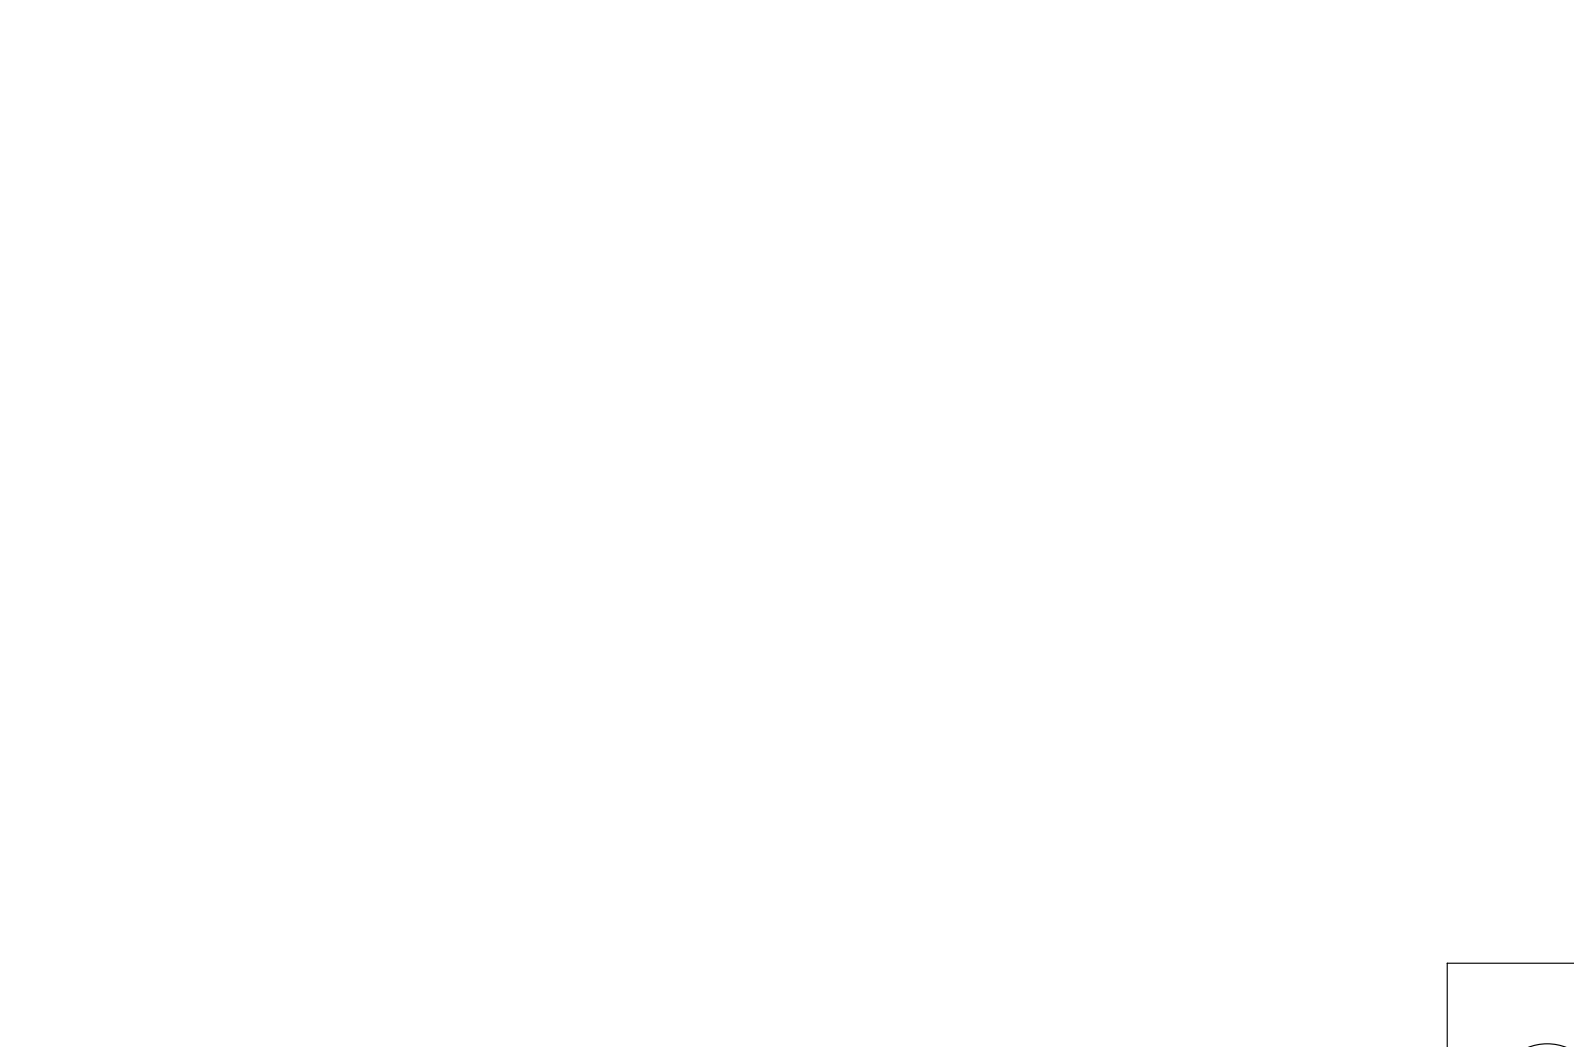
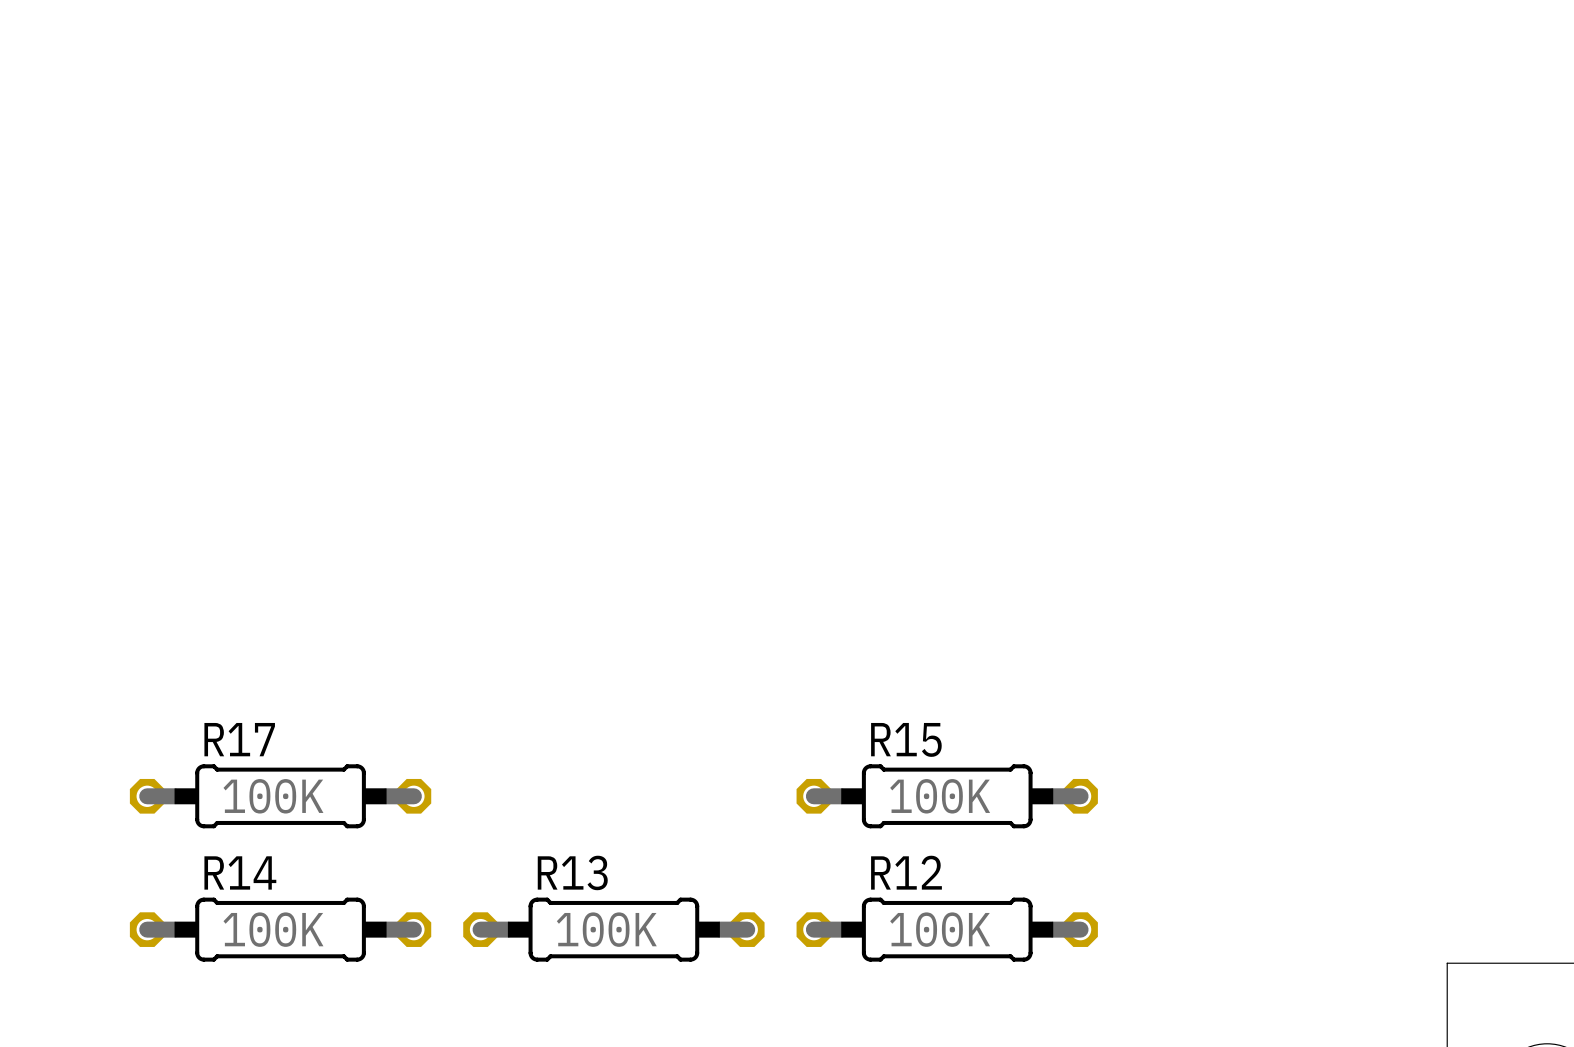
R17: none -> 100K (280, 796)
R15: none -> 100K (947, 796)
R14: none -> 100K (280, 929)
R13: none -> 100K (613, 929)
R12: none -> 100K (947, 929)

